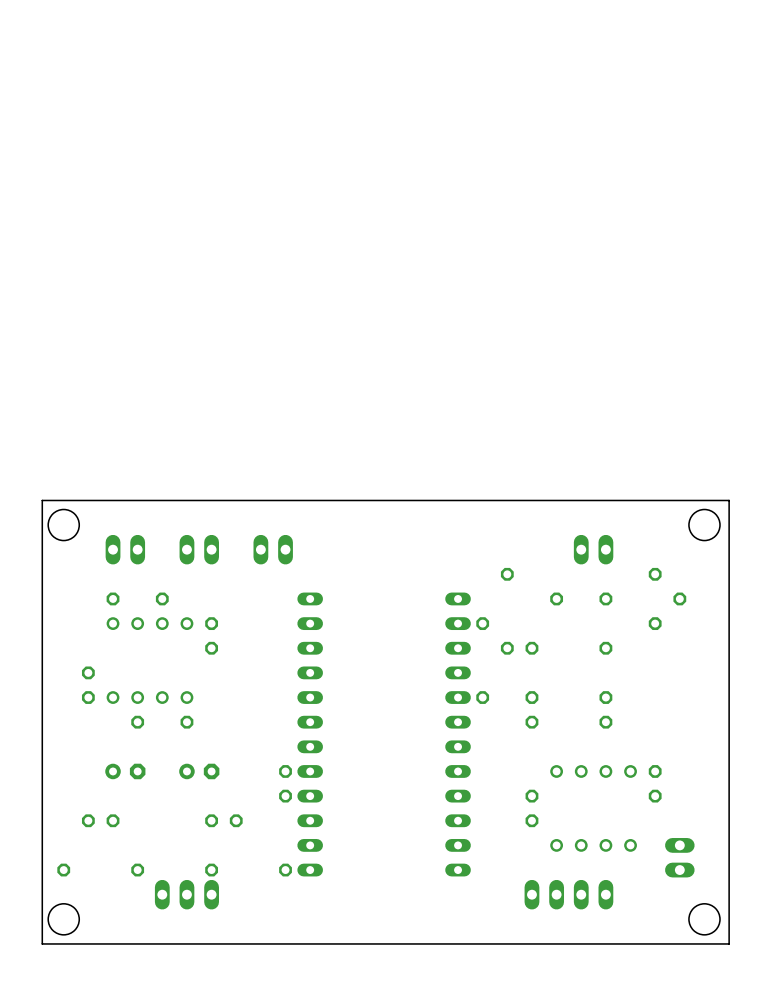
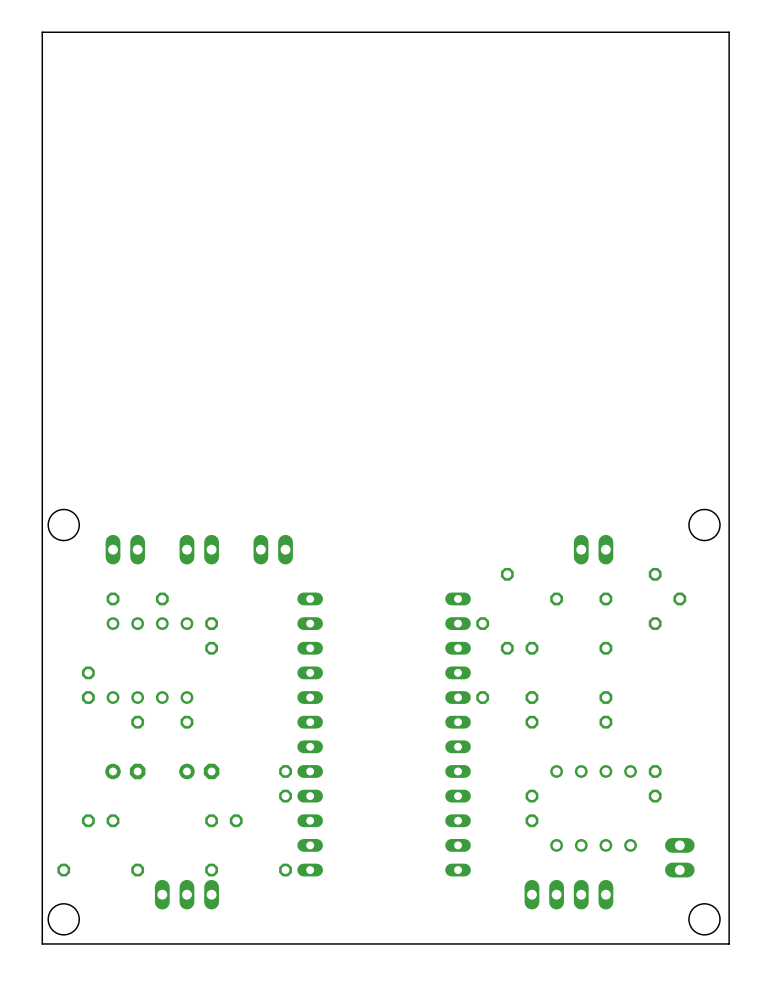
board edge: (729, 500) (42, 500) -> (729, 500) (729, 32) (42, 32) (42, 500)

